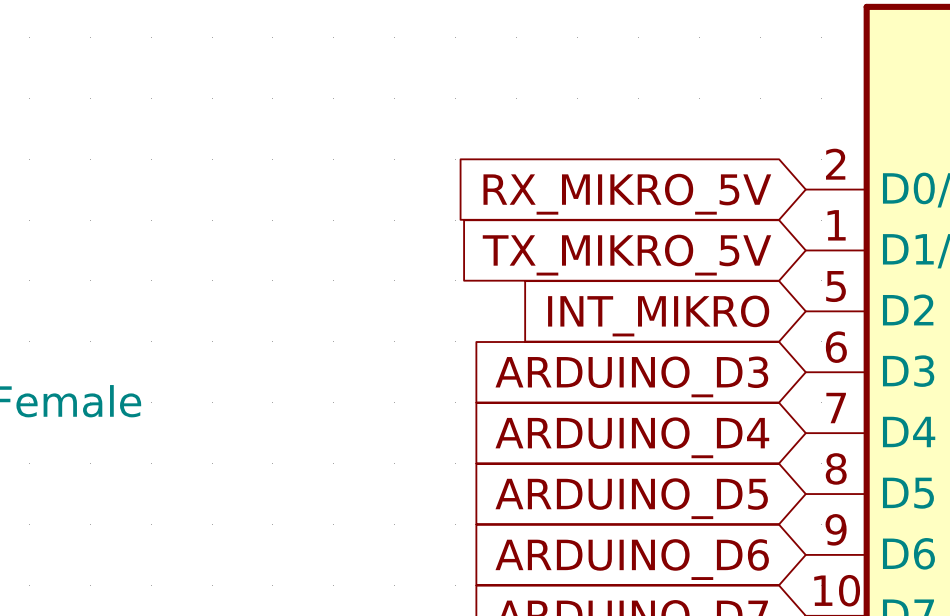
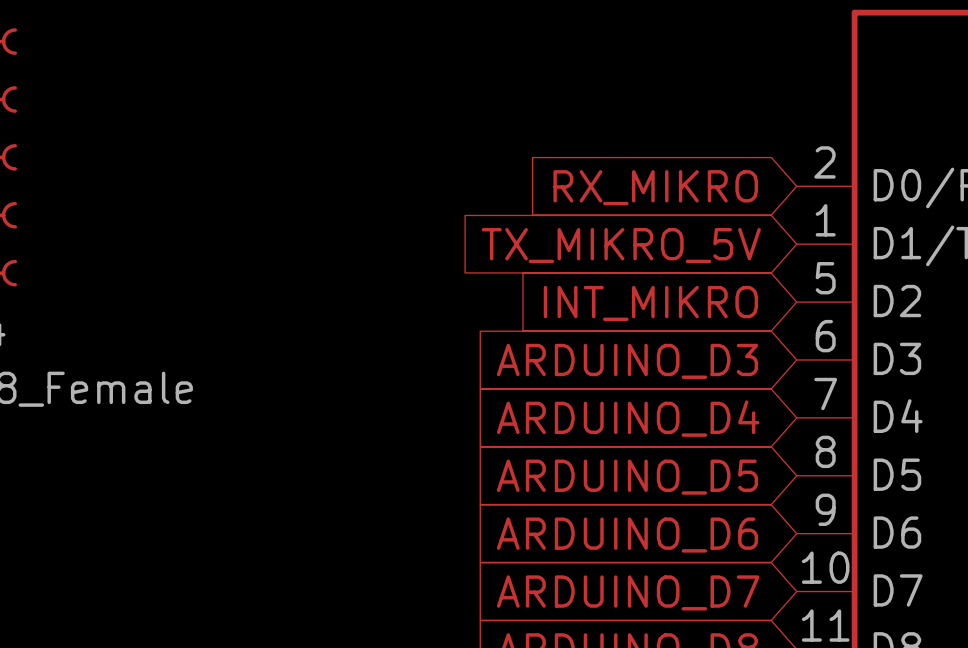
global label: RX_MIKRO_5V (627, 194) -> RX_MIKRO (655, 187)

